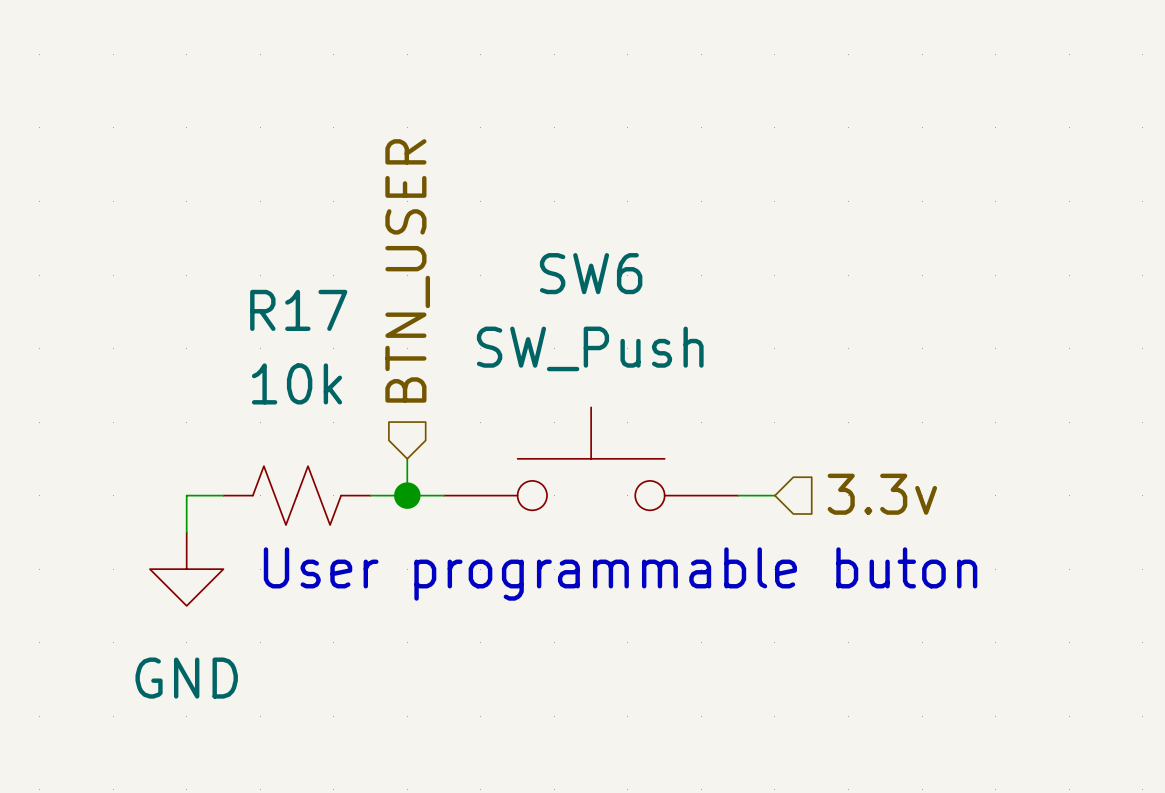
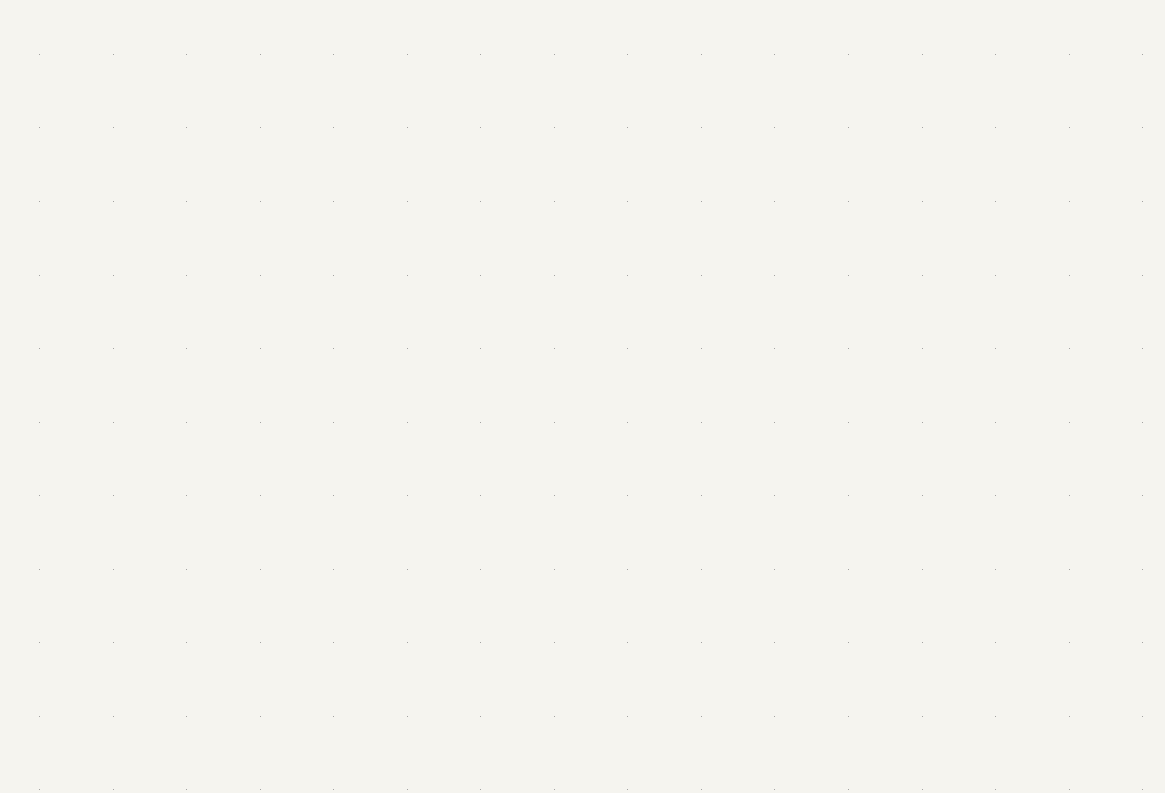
hierarchical label: BTN_USER (407, 270) -> none
wire: (407, 458) (407, 495) -> none
SW6: SW_Push (591, 458) -> none
hierarchical label: 3.3v (882, 494) -> none
wire: (223, 495) (186, 495) (186, 532) -> none
R17: 10k (296, 495) -> none
wire: (370, 495) (444, 495) -> none
junction: (407, 495) -> none
wire: (738, 495) (774, 495) -> none
power symbol: GND (186, 569) -> none
text: User programmable buton (620, 574) -> none

